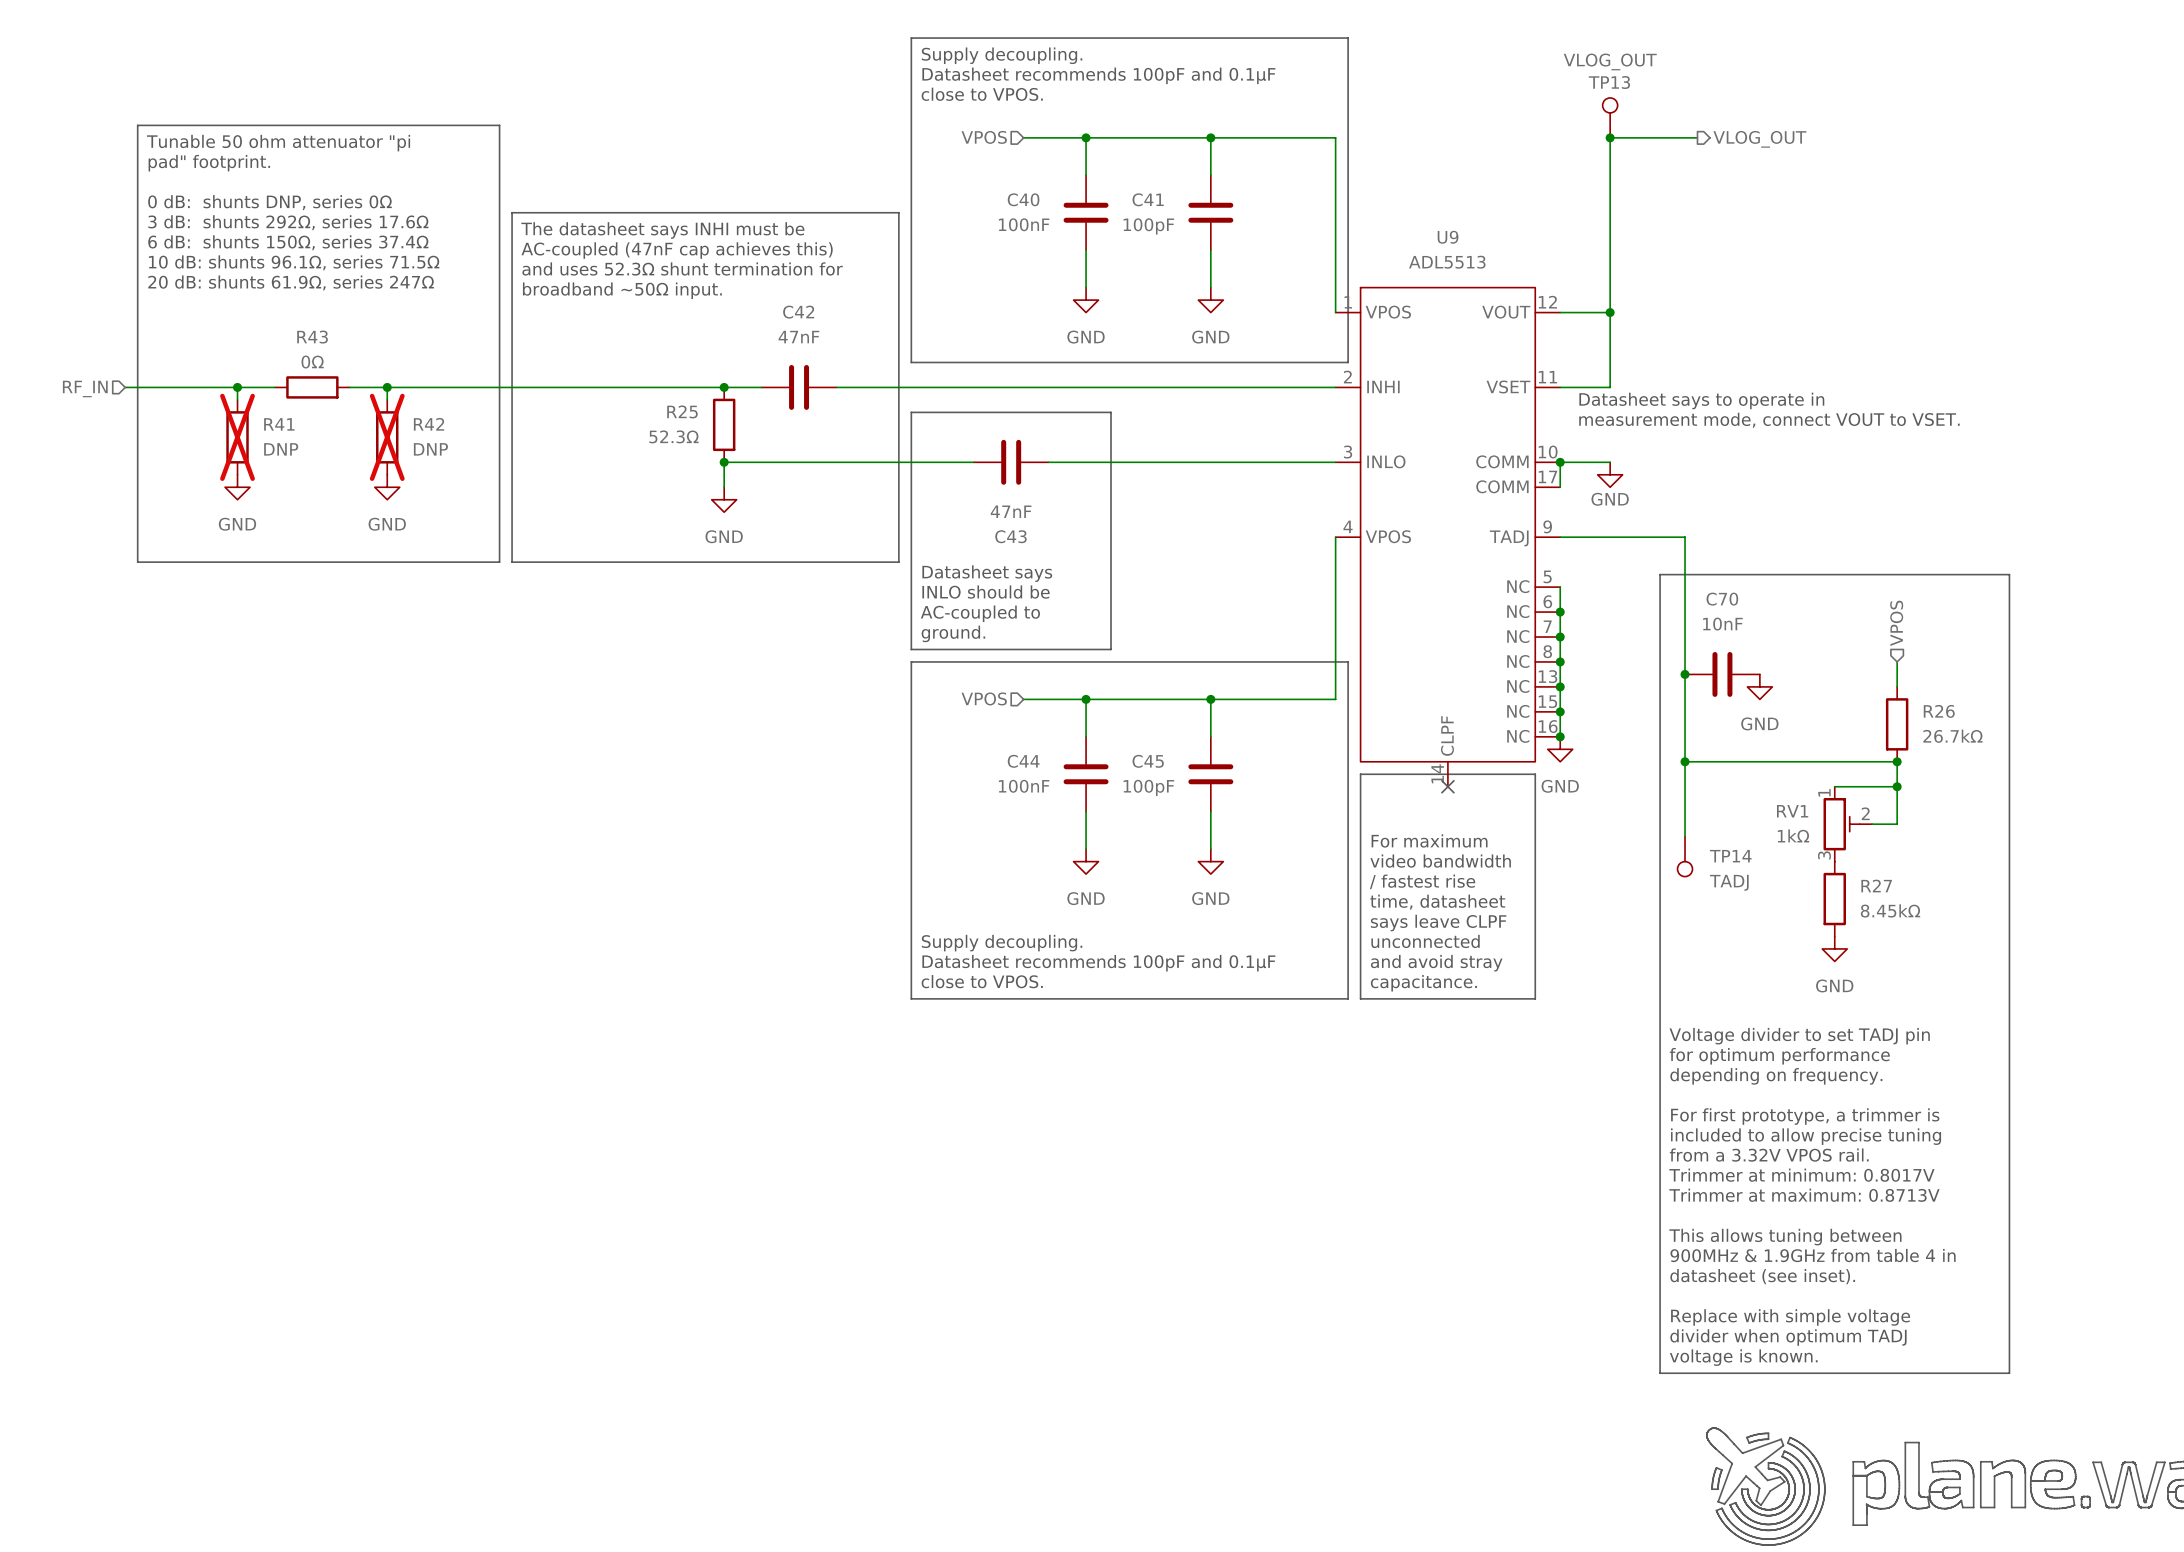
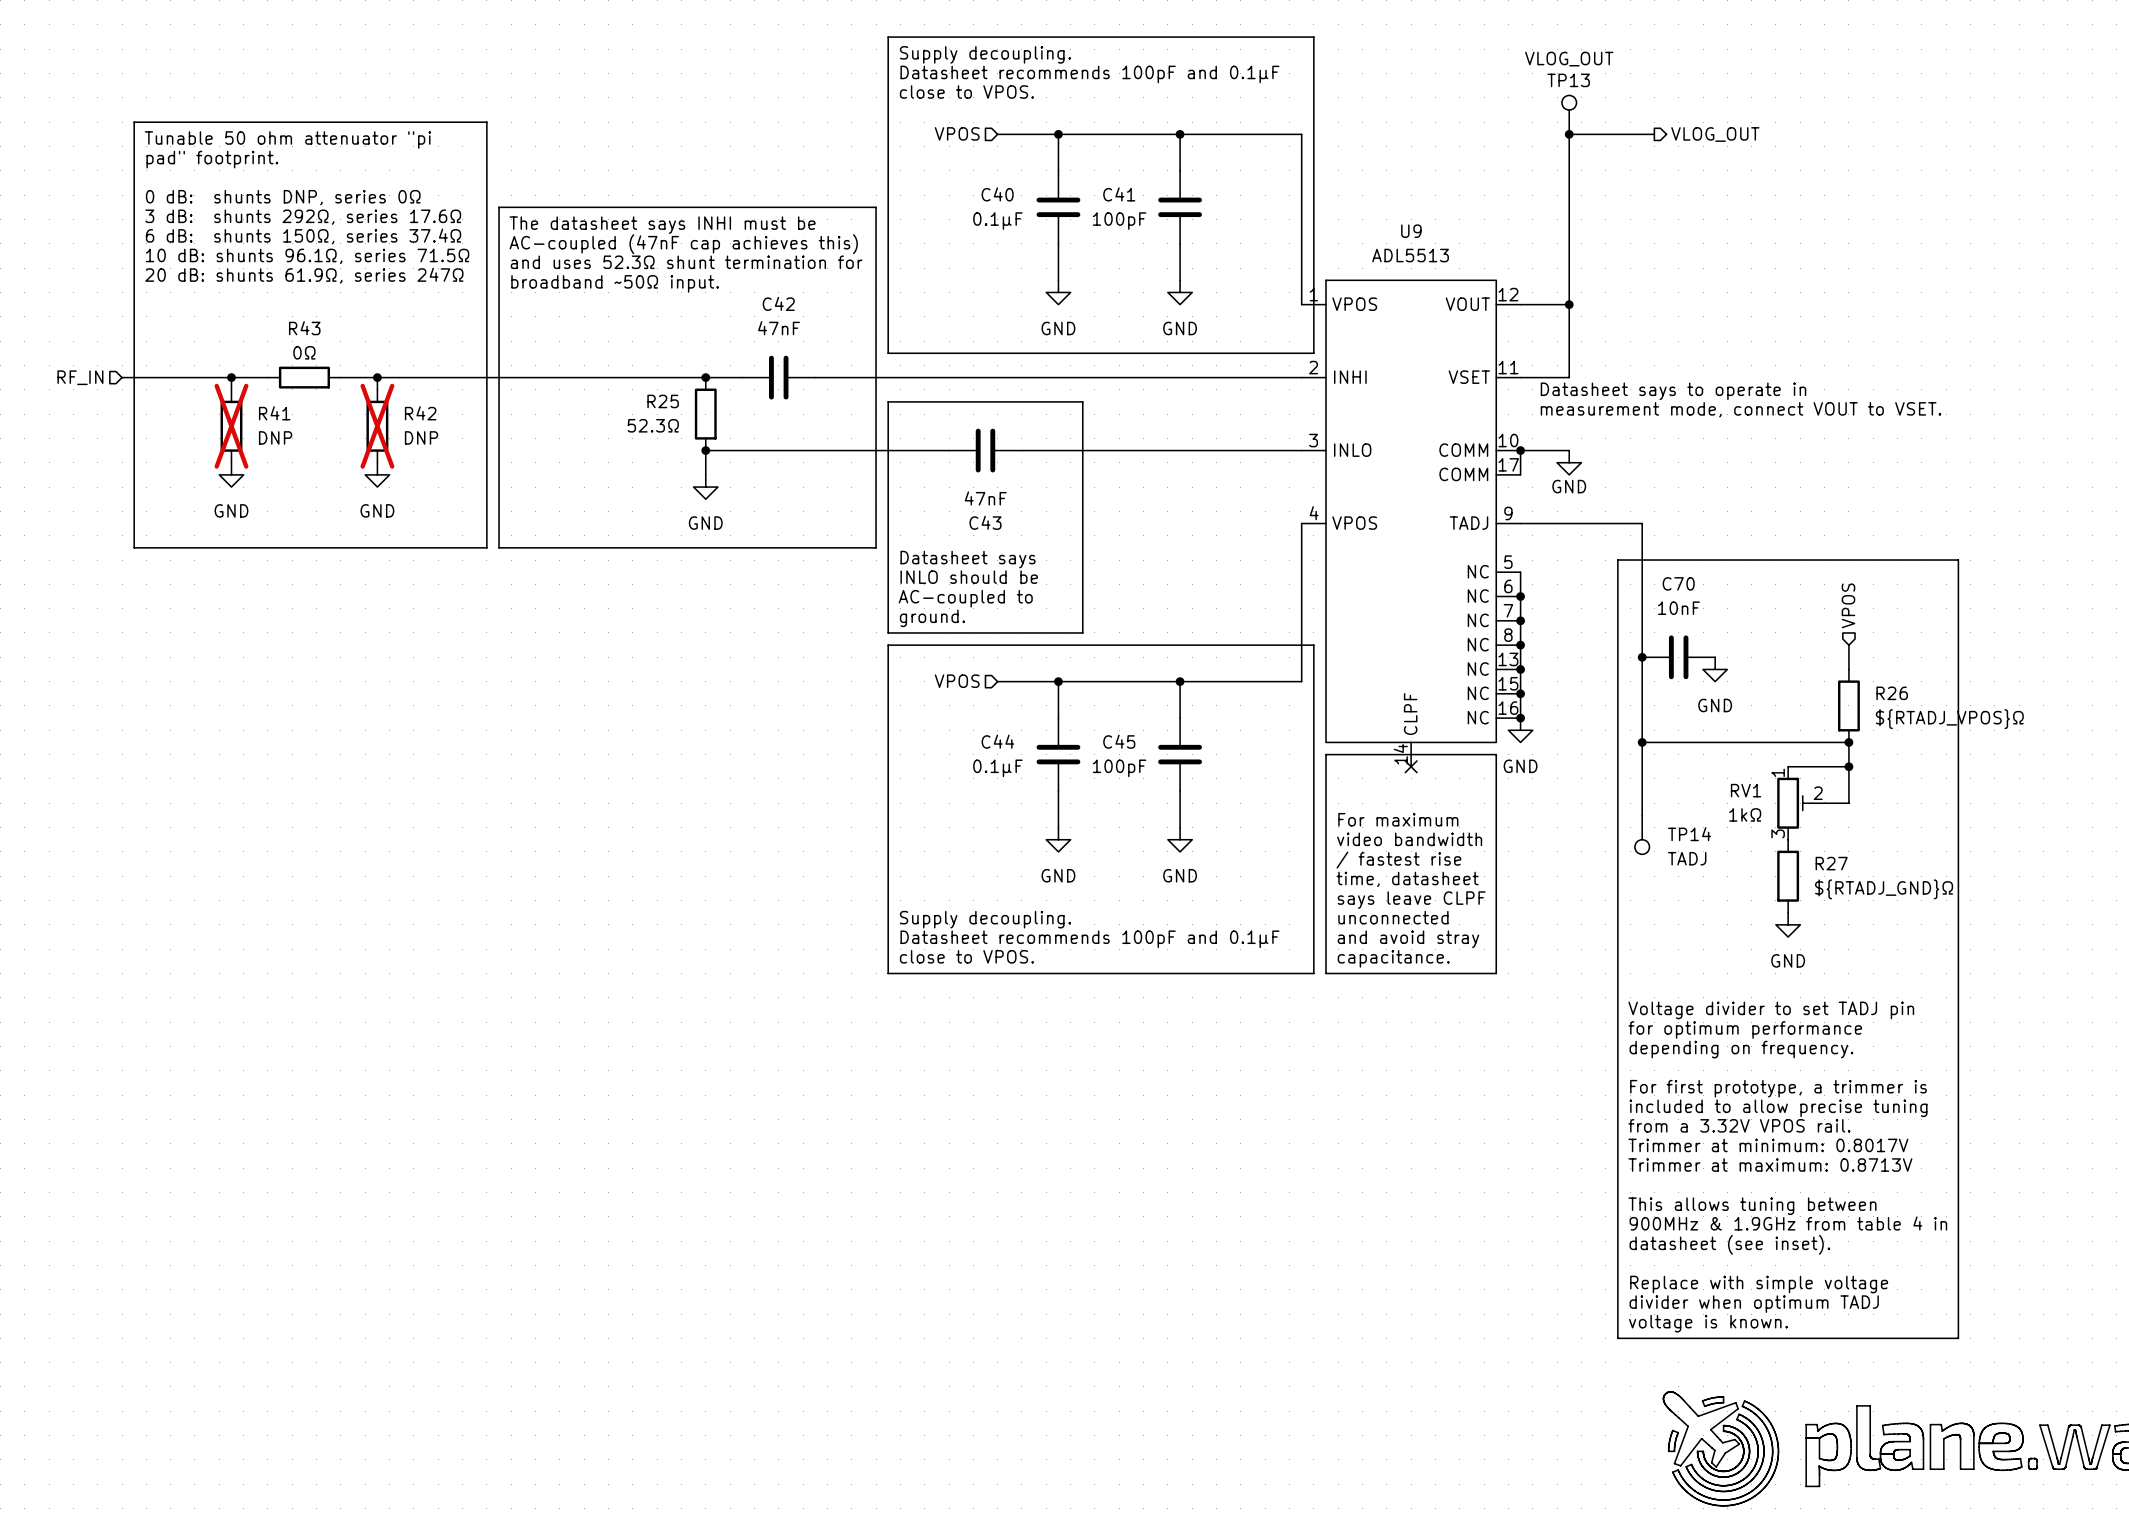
C40 value: 100nF (1024, 224) -> 0.1µF (997, 221)
R26 value: 26.7kΩ (1952, 736) -> ${RTADJ_VPOS}Ω (1949, 719)
C44 value: 100nF (1024, 786) -> 0.1µF (997, 768)
R27 value: 8.45kΩ (1890, 910) -> ${RTADJ_GND}Ω (1884, 889)

